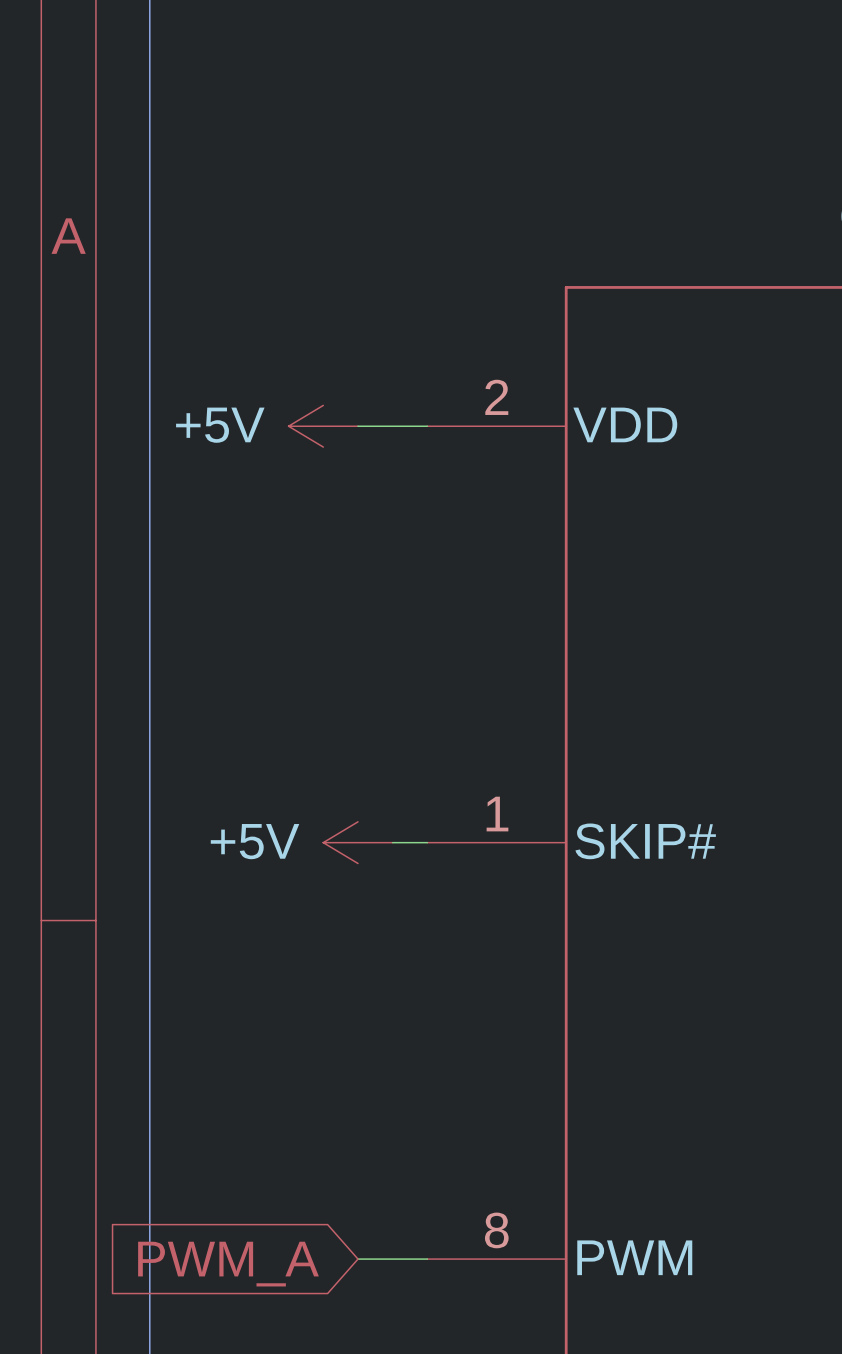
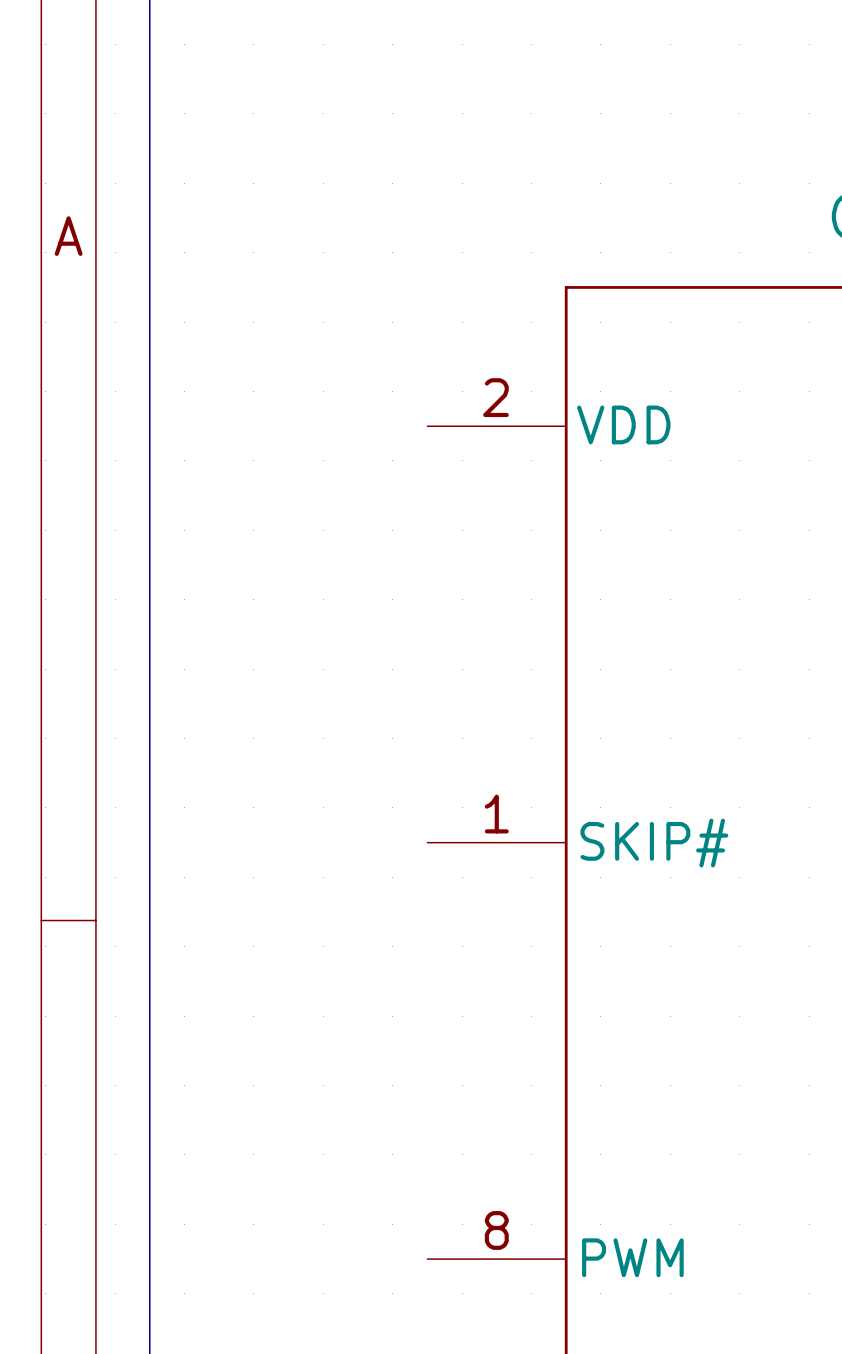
power symbol: +5V (323, 426) -> none
wire: (357, 426) (427, 426) -> none
power symbol: +5V (357, 842) -> none
wire: (392, 842) (427, 842) -> none
wire: (357, 1259) (427, 1259) -> none
global label: PWM_A (228, 1264) -> none

